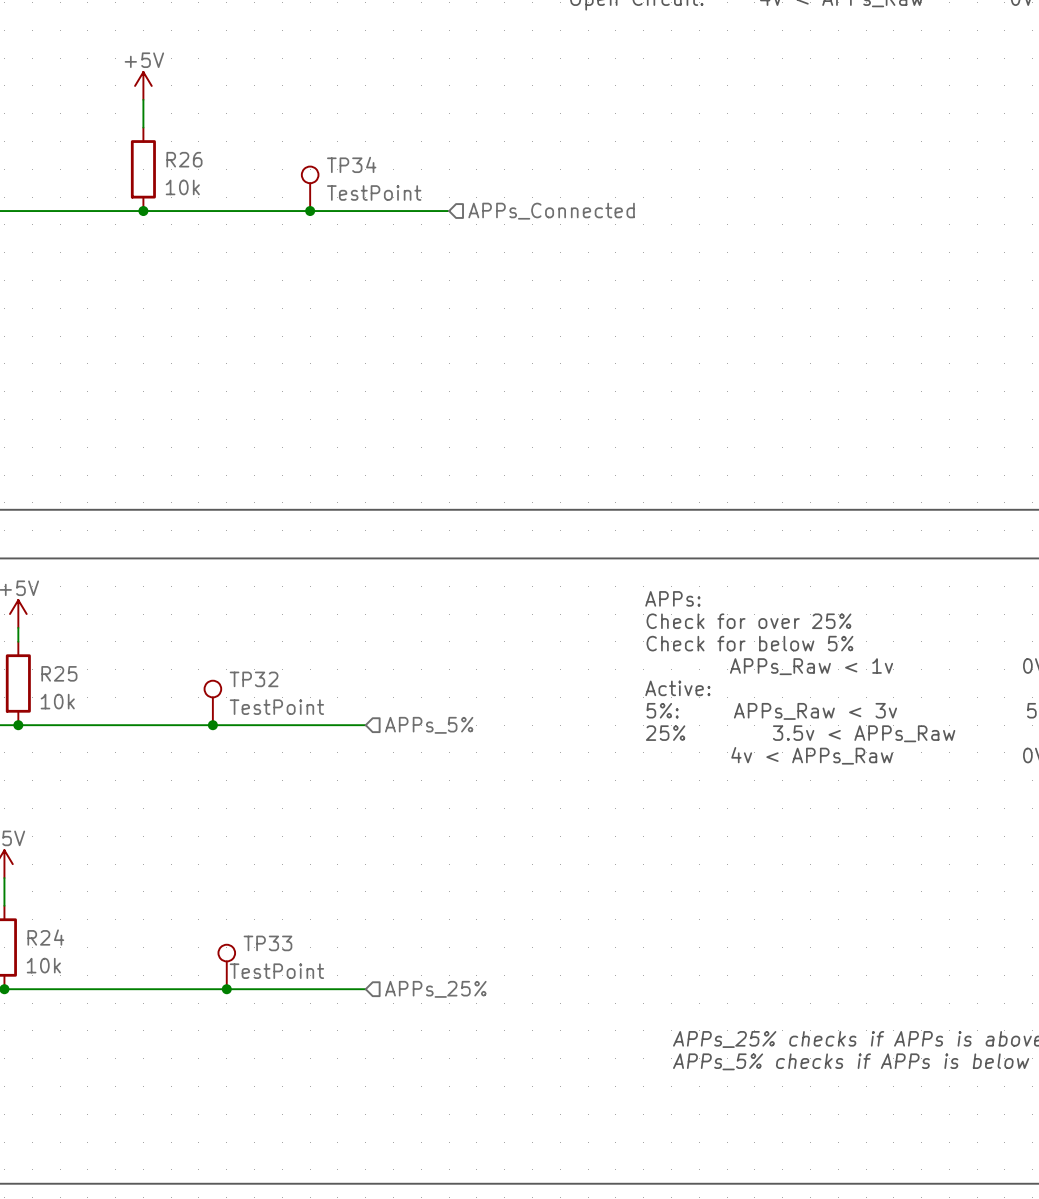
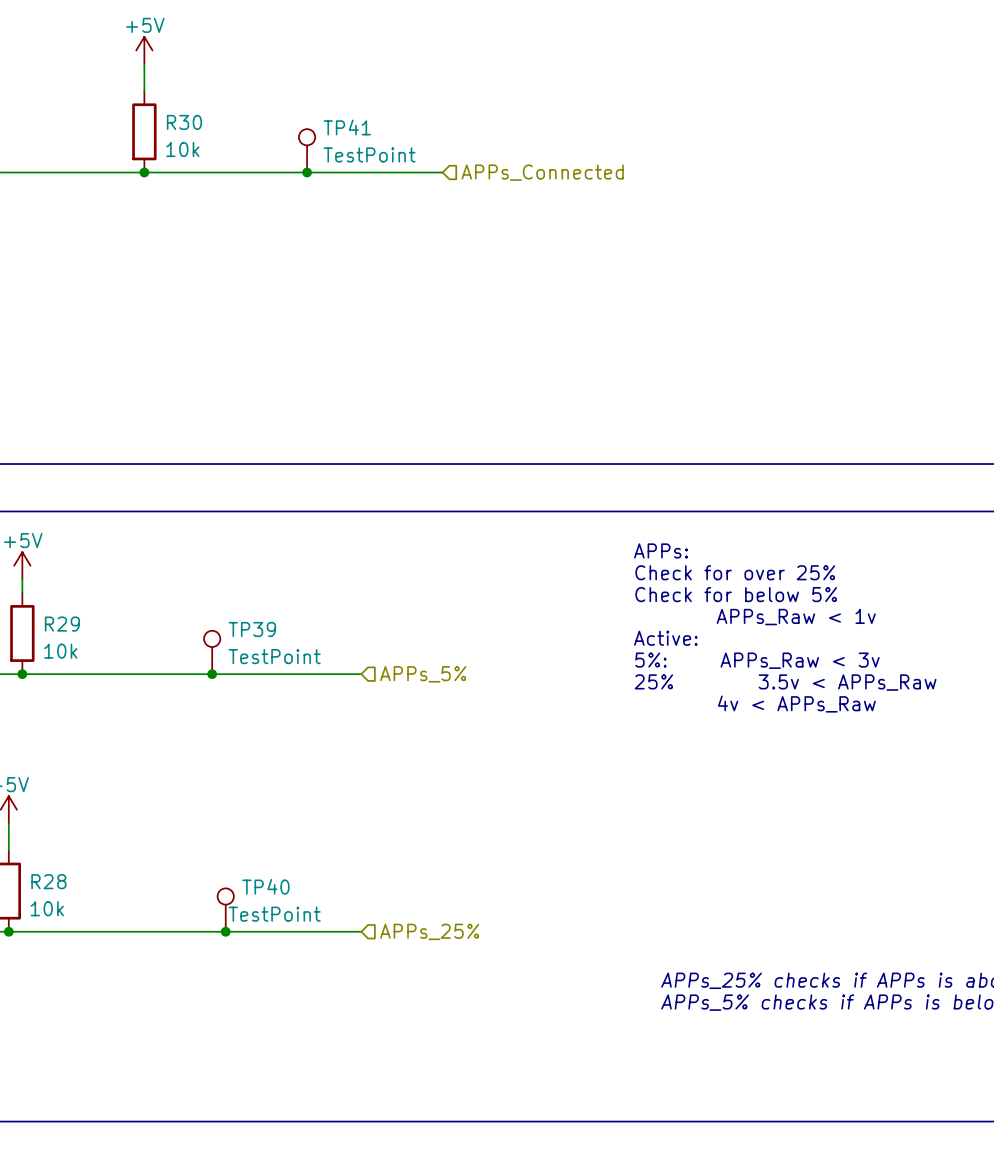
R26 name: R26 (184, 159) -> R30 (184, 122)
TP34 name: TP34 (351, 164) -> TP41 (347, 127)
R25 name: R25 (59, 673) -> R29 (62, 624)
TP32 name: TP32 (254, 679) -> TP39 (252, 629)
R24 name: R24 (45, 937) -> R28 (48, 881)
TP33 name: TP33 (267, 943) -> TP40 (265, 886)

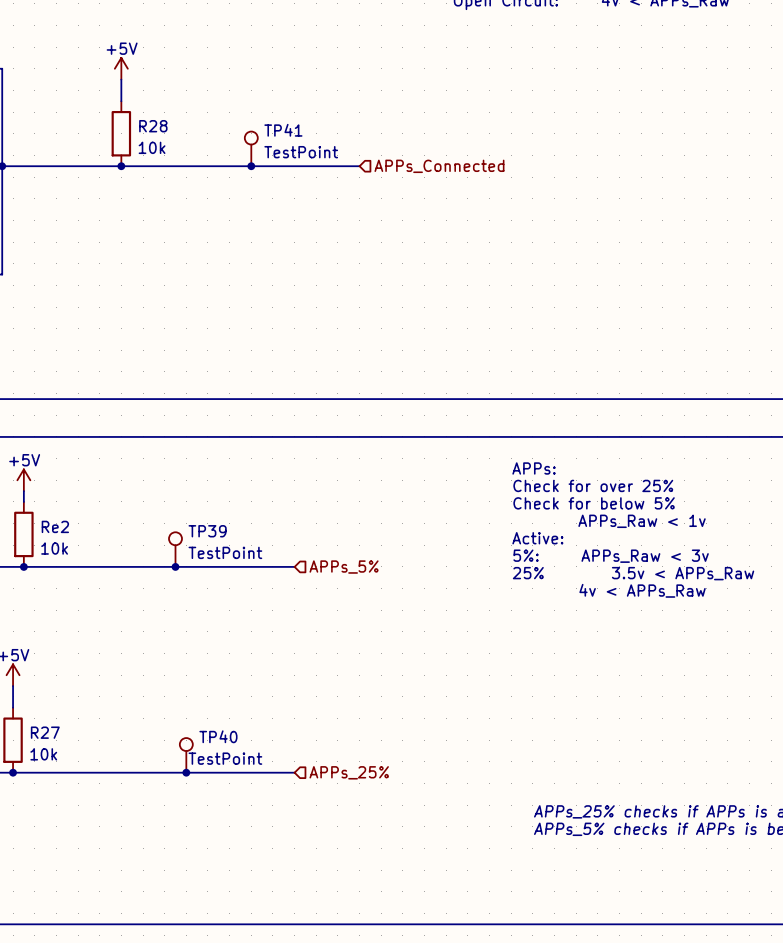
R30 name: R30 (184, 122) -> R28 (153, 126)
R29 name: R29 (62, 624) -> Re2 (55, 526)
R28 name: R28 (48, 881) -> R27 (45, 732)

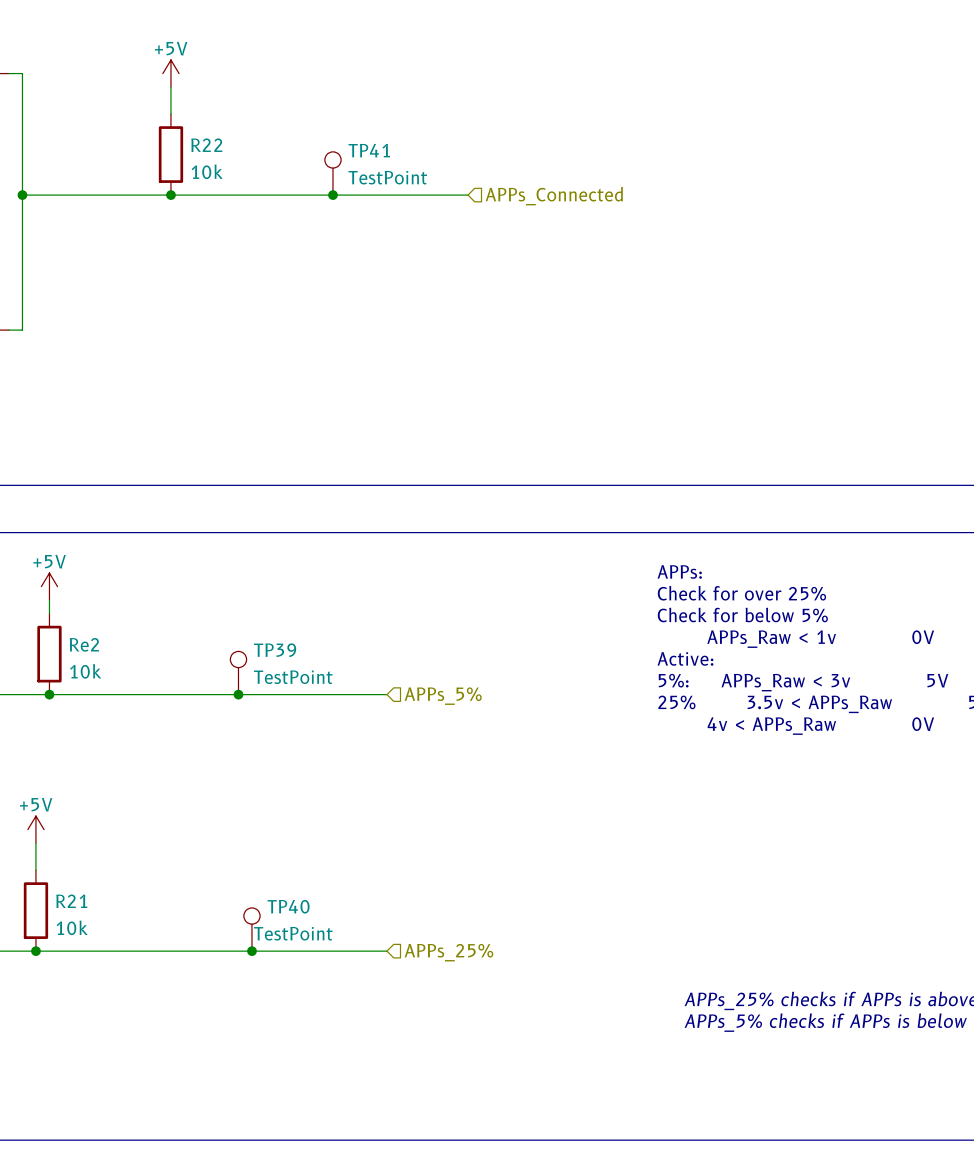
R28 name: R28 (153, 126) -> R22 (206, 145)
R27 name: R27 (45, 732) -> R21 (71, 901)

